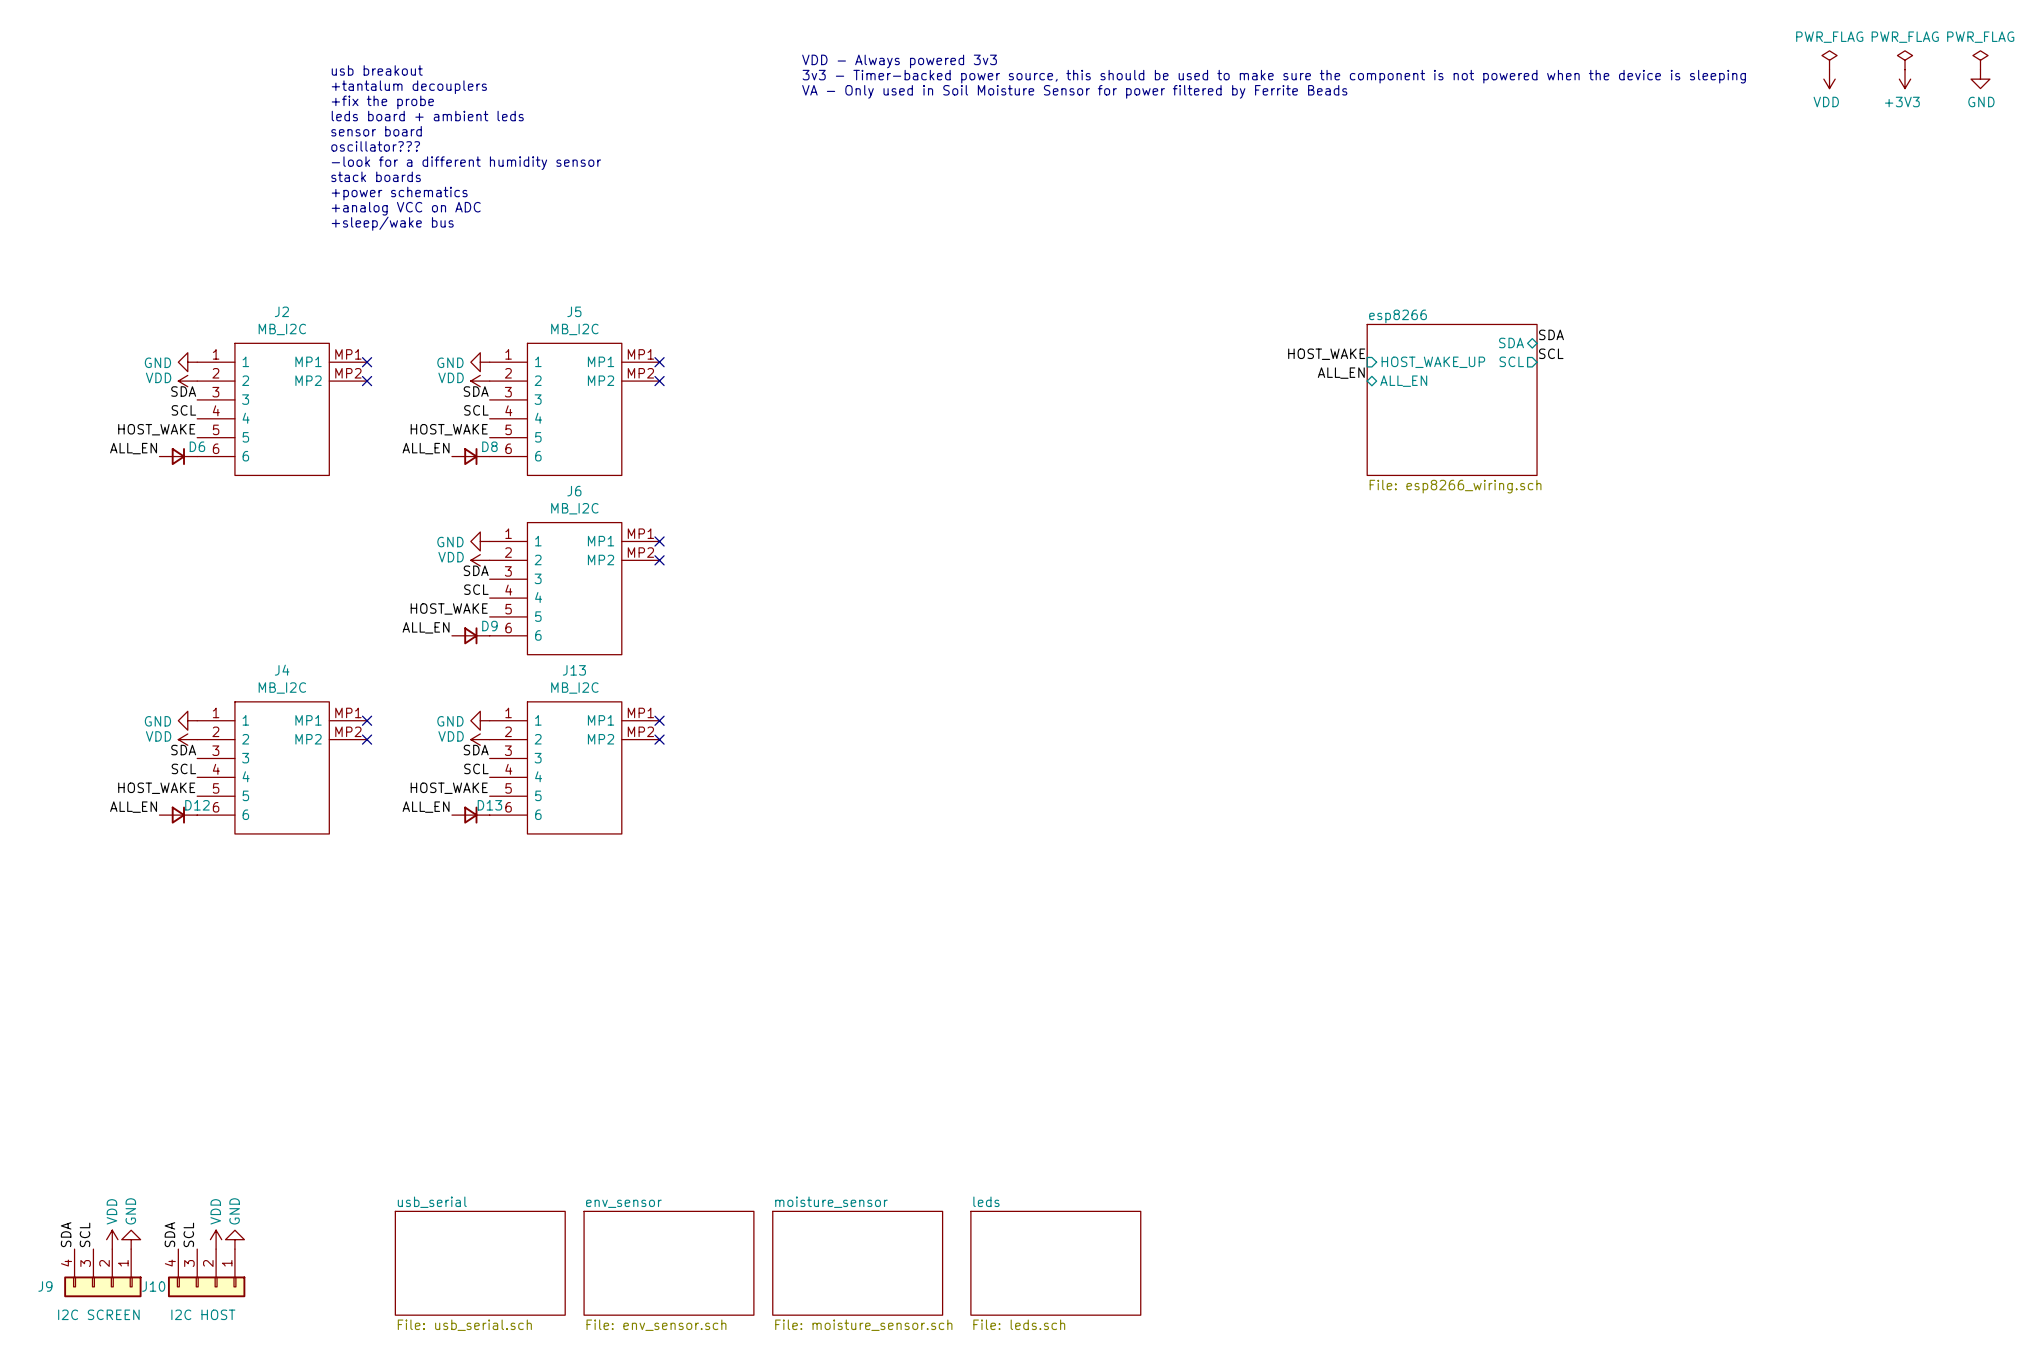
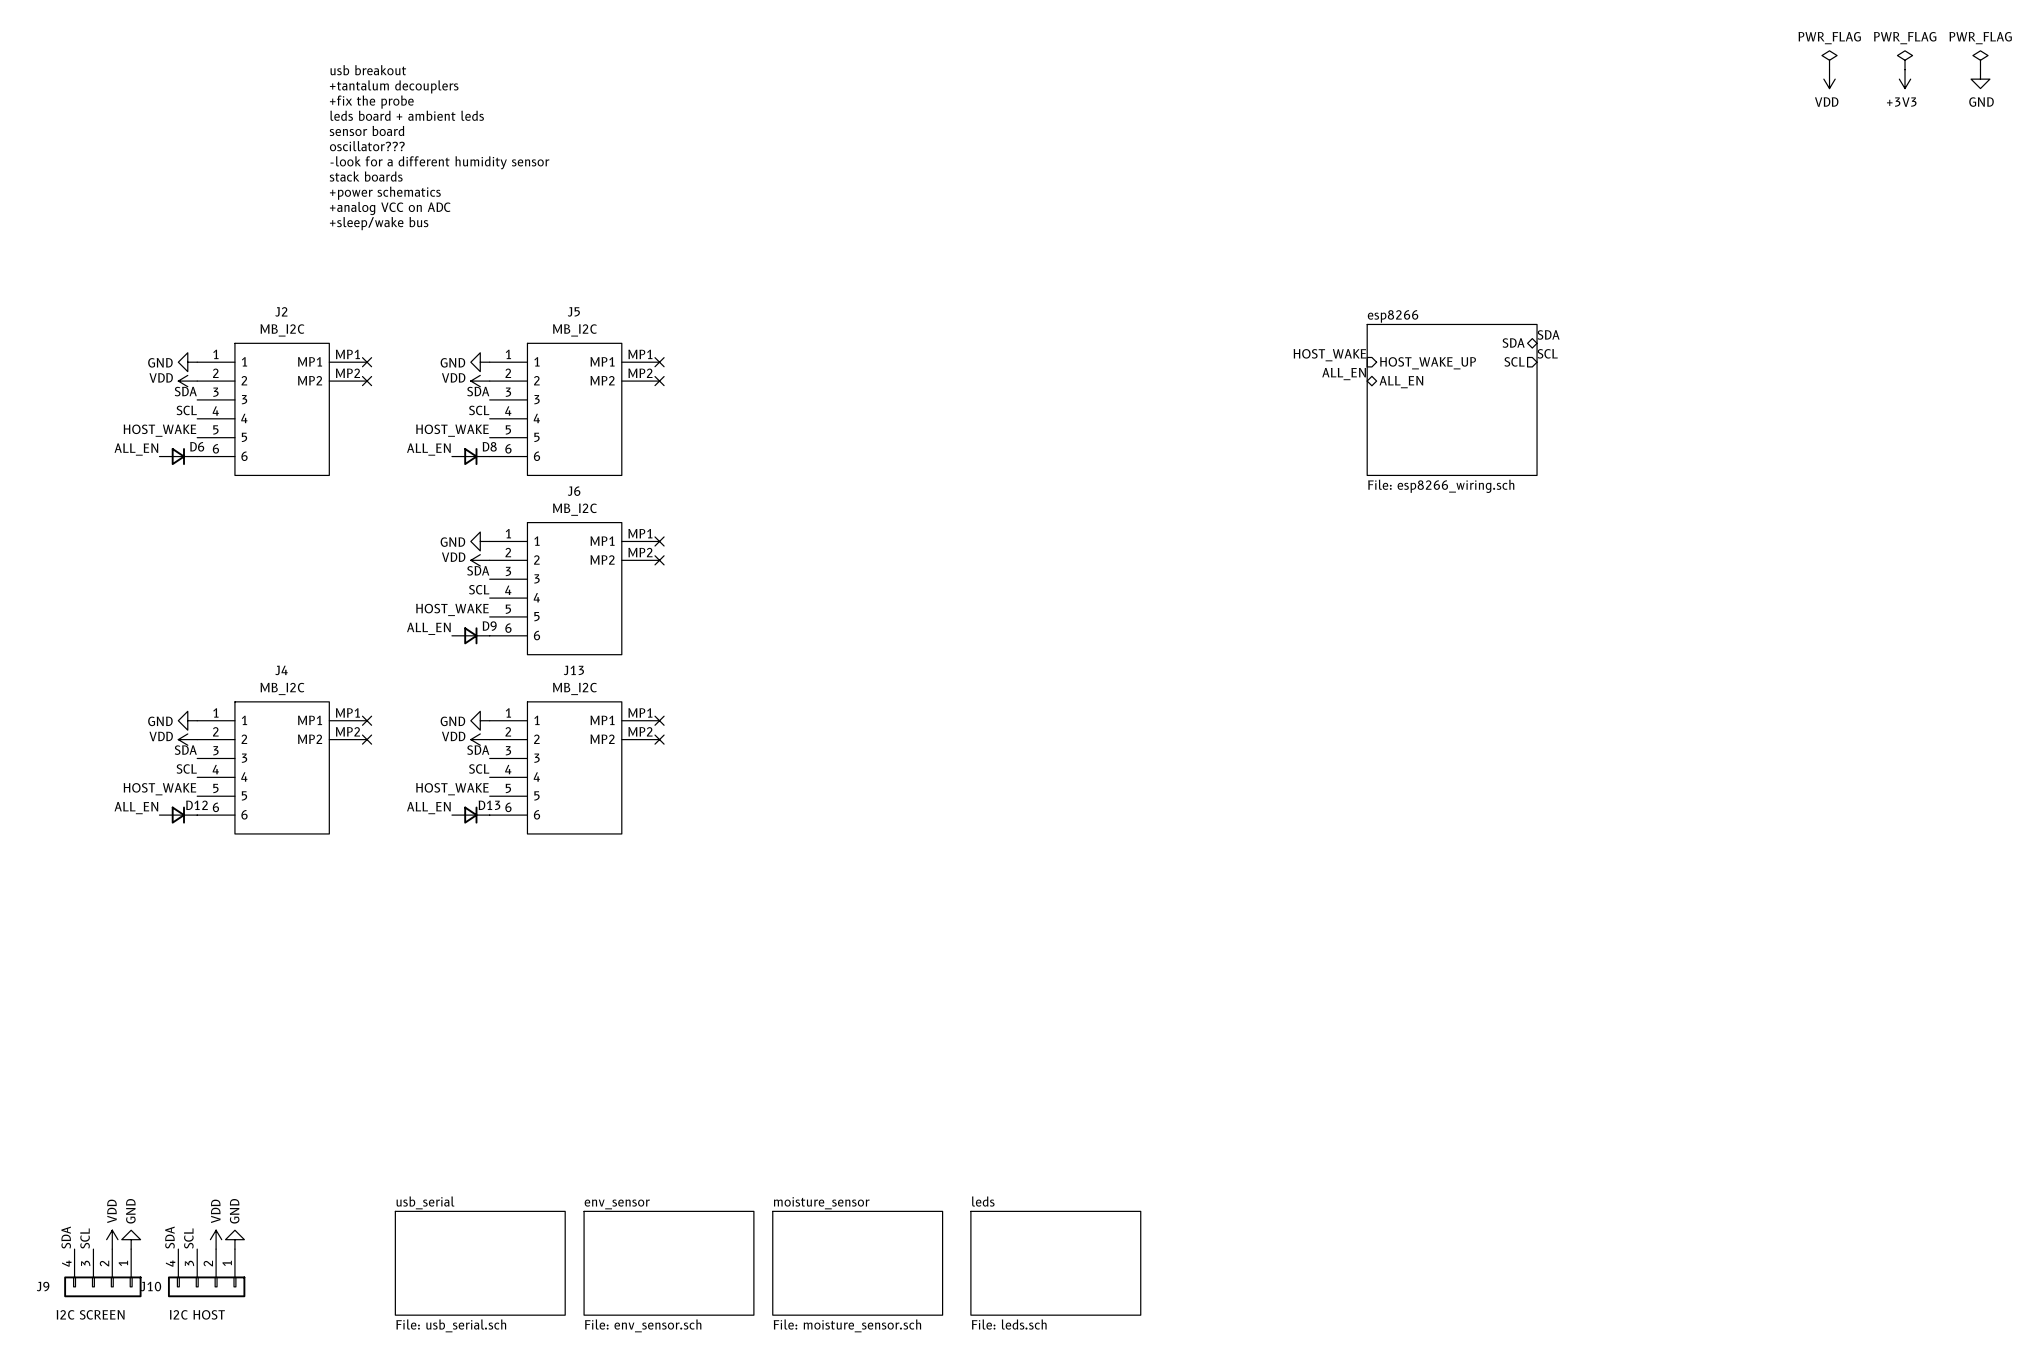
text: VDD - Always powered 3v3 (899, 61) -> none
text: 3v3 - Timer-backed power source, this should be used to make sure the component is not powered when the device is sleeping (1274, 76) -> none
text: VA - Only used in Soil Moisture Sensor for power filtered by Ferrite Beads (1074, 91) -> none

